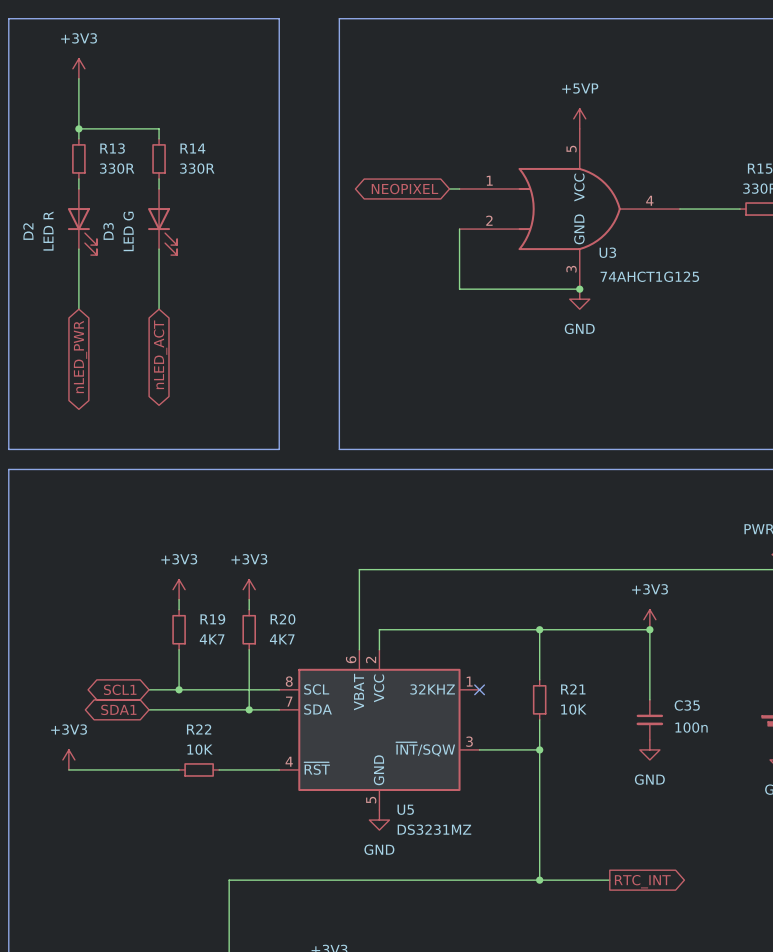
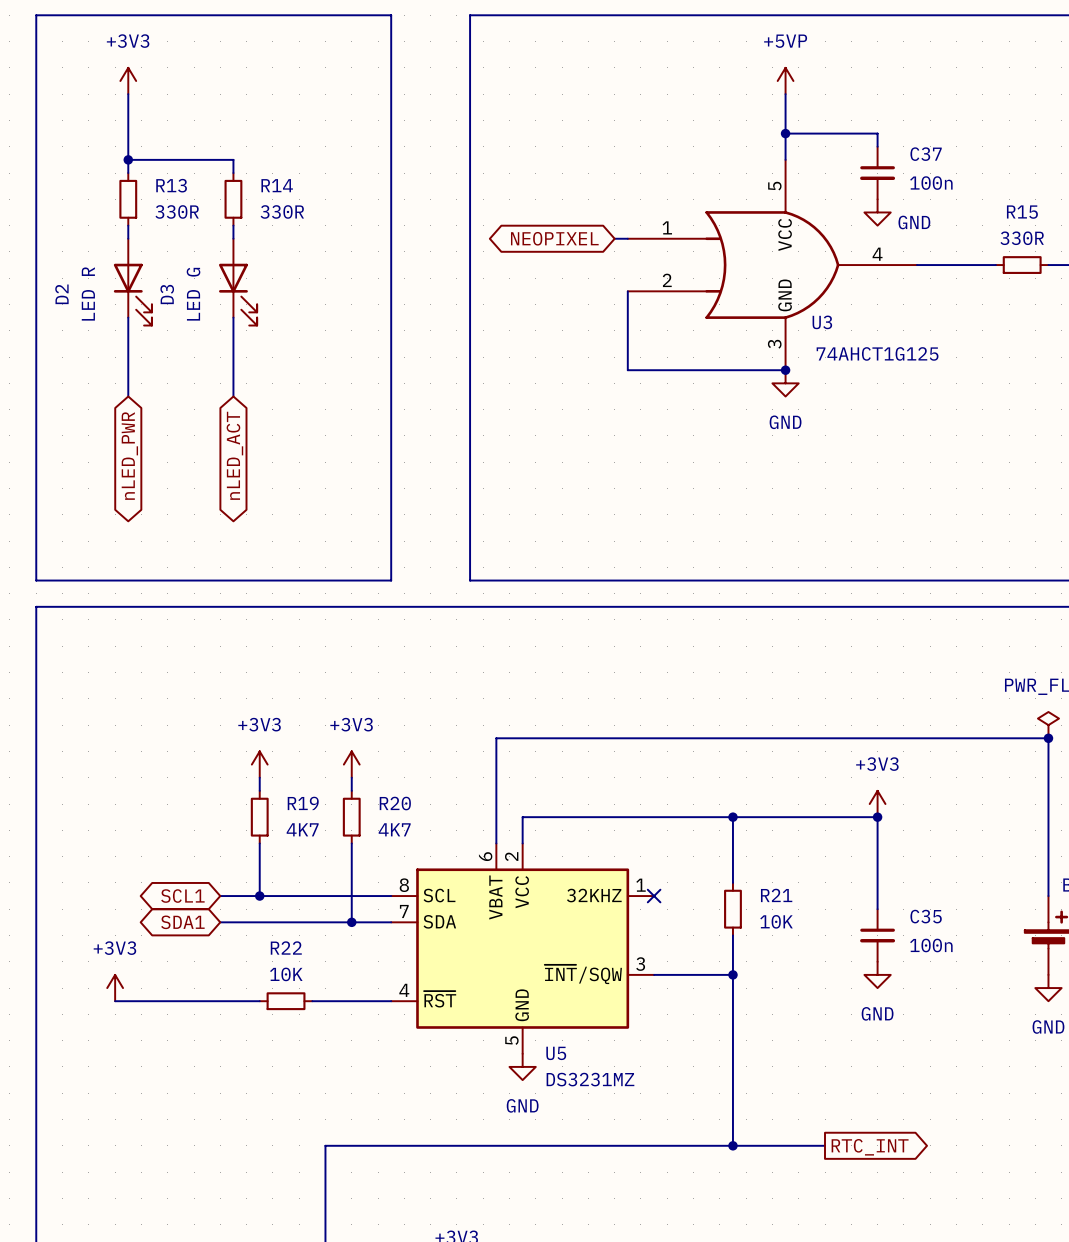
wire: none -> (785, 94) (785, 159)
wire: none -> (785, 133) (877, 133) (877, 146)
junction: none -> (785, 133)
power symbol position: +5VP (579, 118) -> +5VP (785, 81)
C37: none -> 100n (877, 173)
power symbol: none -> GND (877, 212)

